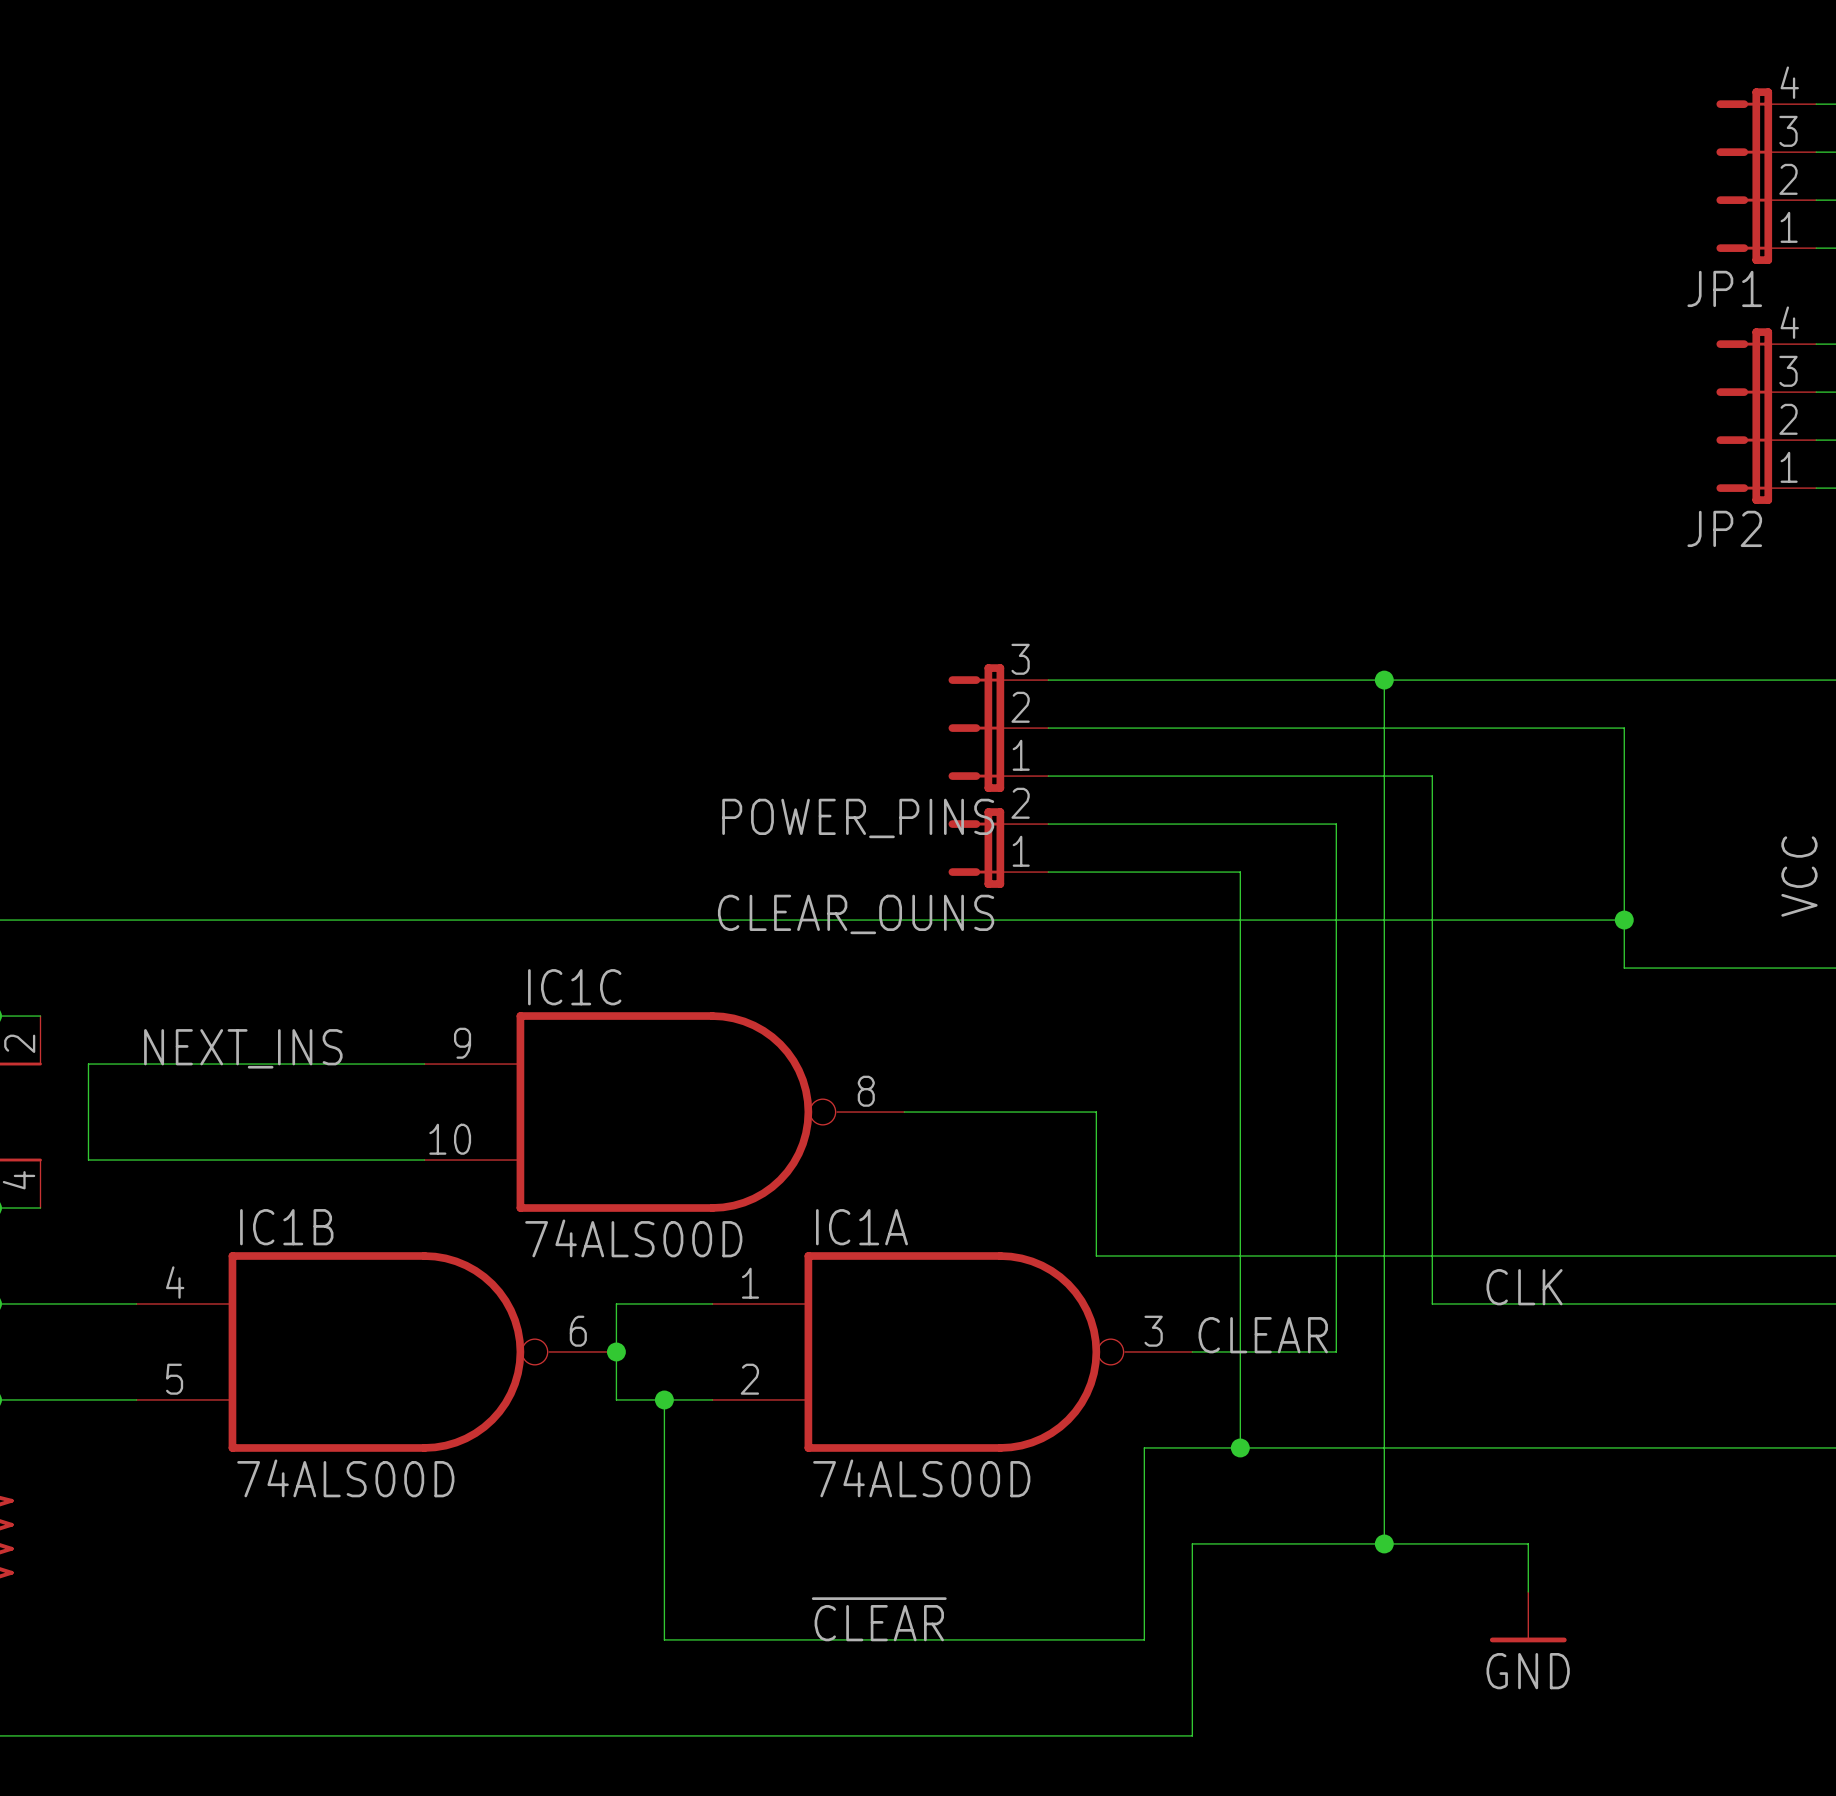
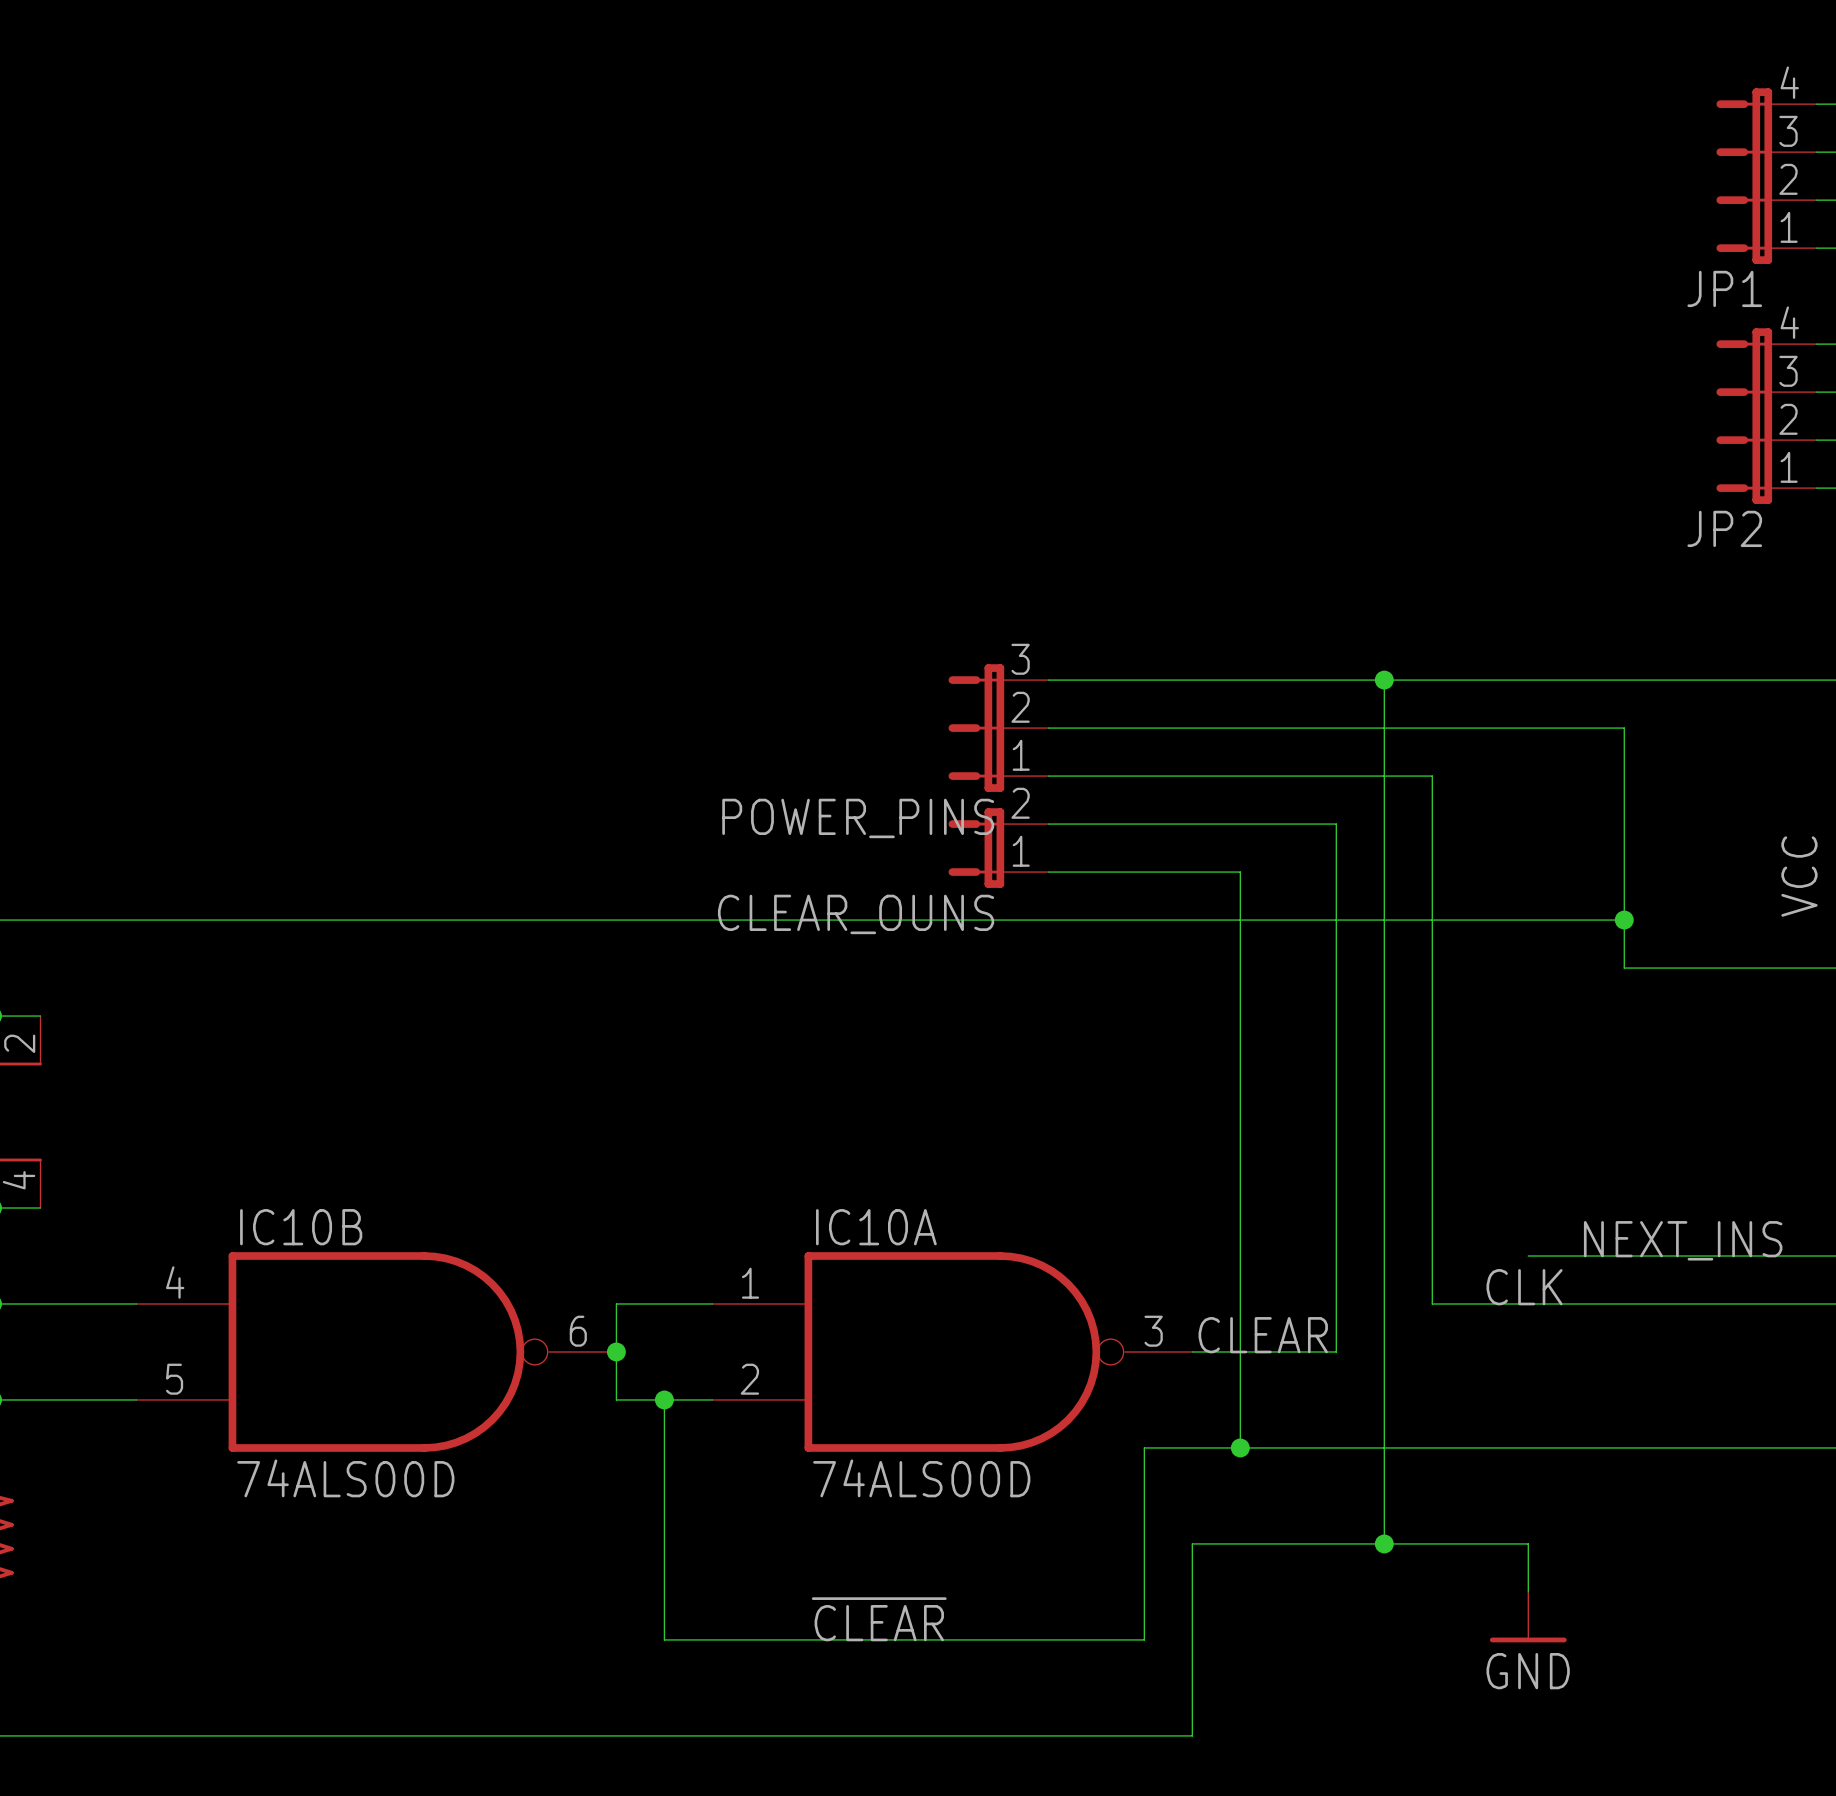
label: NEXT_INS (243, 1048) -> none
wire: (424, 1064) (88, 1064) (88, 1160) (424, 1160) -> none
IC1C: 74ALS00D (664, 1112) -> none
wire: (904, 1112) (1096, 1112) (1096, 1256) (1528, 1256) -> none
IC1B name: IC1B (286, 1227) -> IC10B (301, 1227)
IC1A name: IC1A (861, 1227) -> IC10A (876, 1227)
label: none -> NEXT_INS (1683, 1240)

